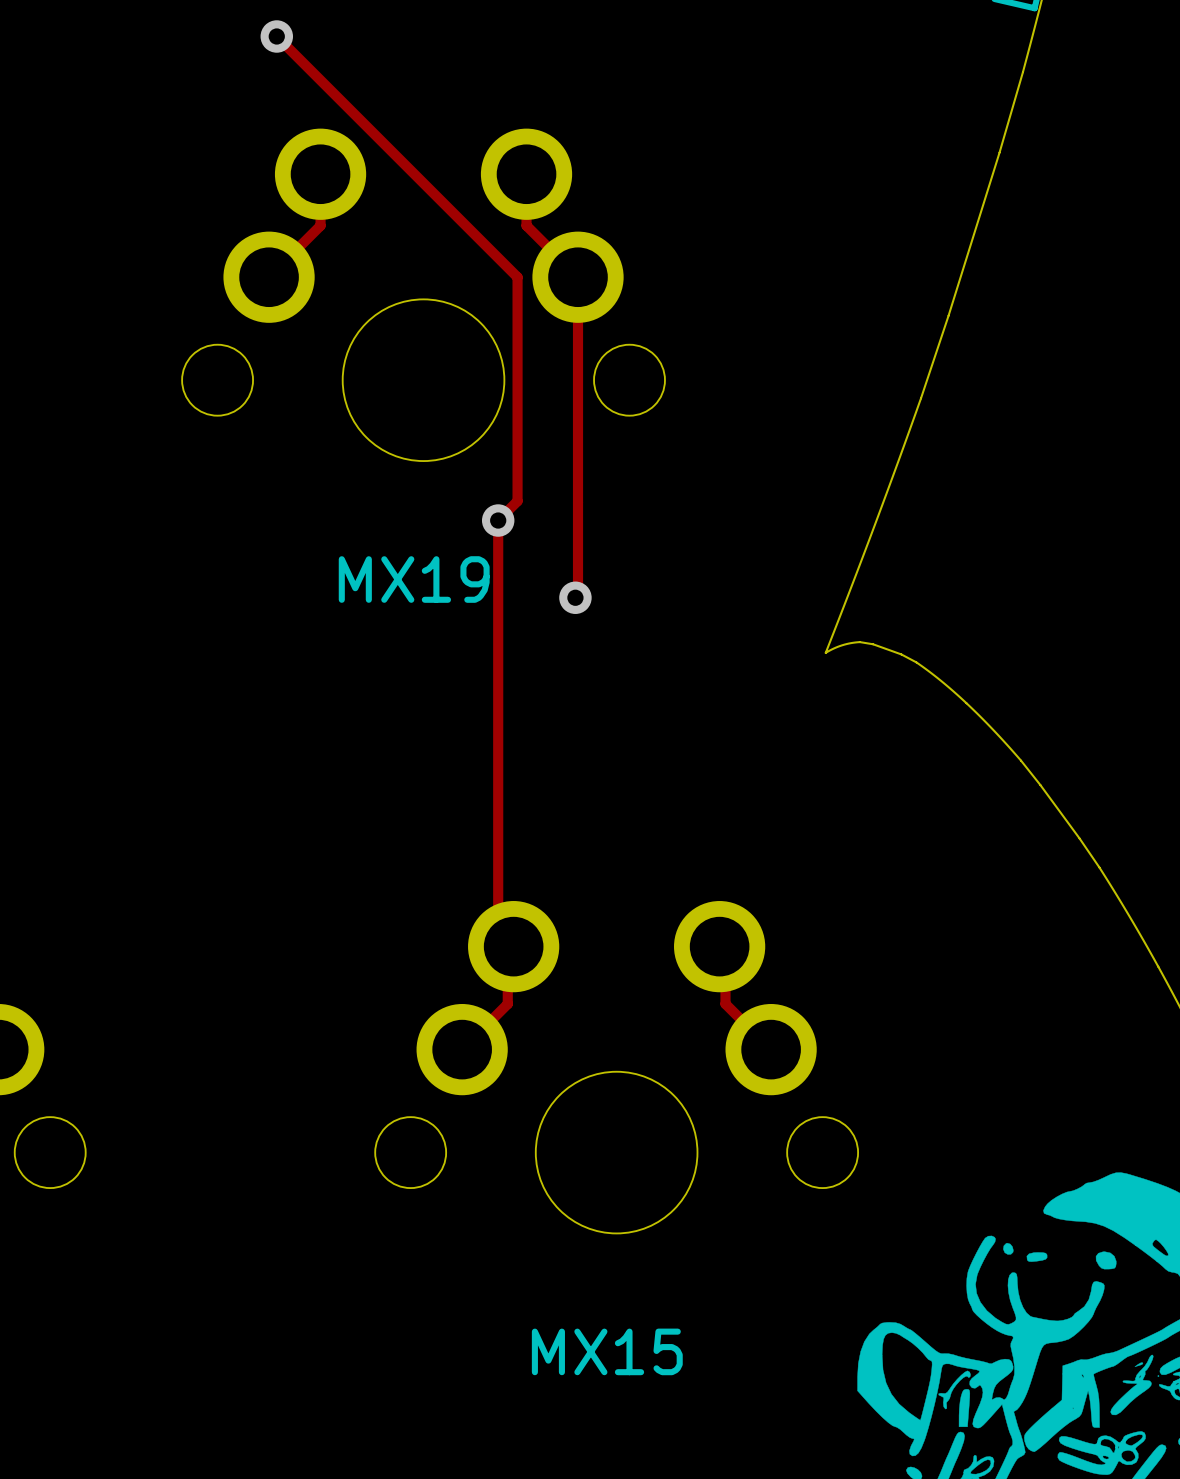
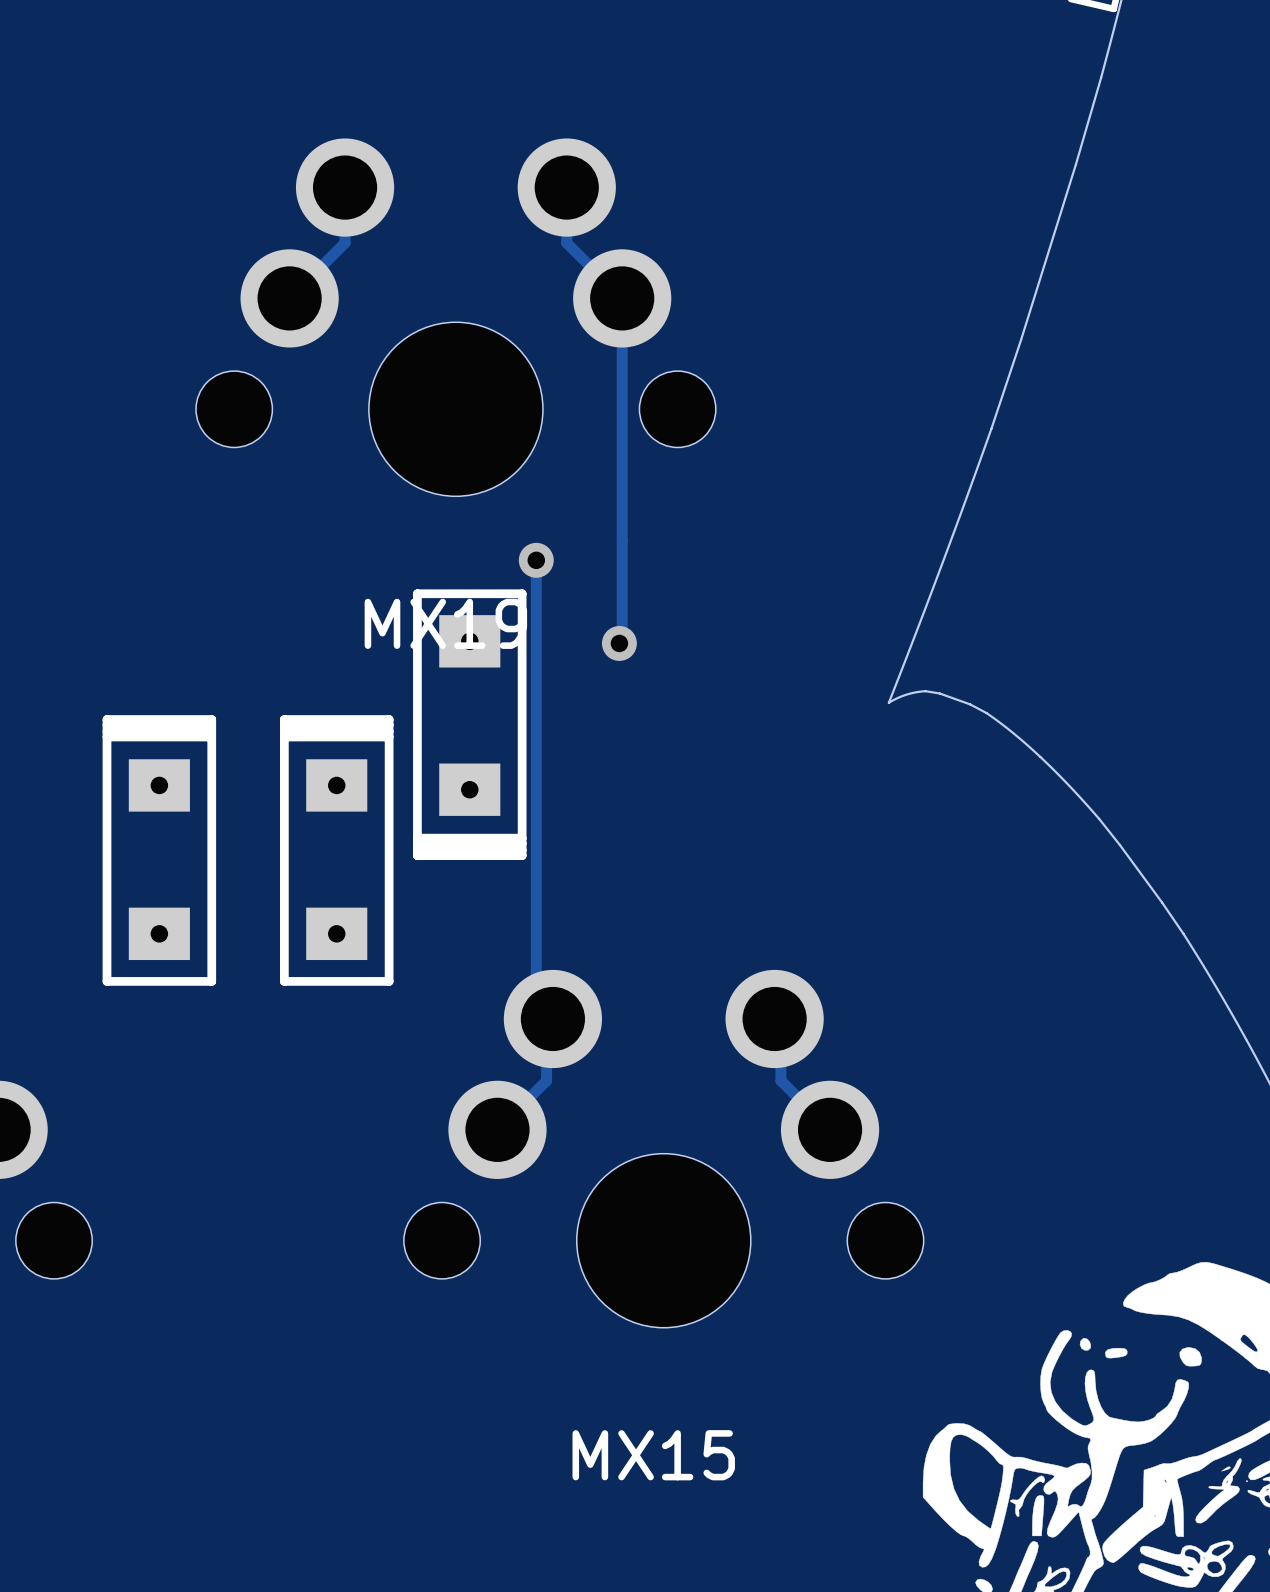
track: (276, 36) (517, 277) (517, 501) (498, 520) -> none
via: (276, 36) -> none
part: none -> (469, 724)
part: none -> (159, 850)
part: none -> (336, 850)

